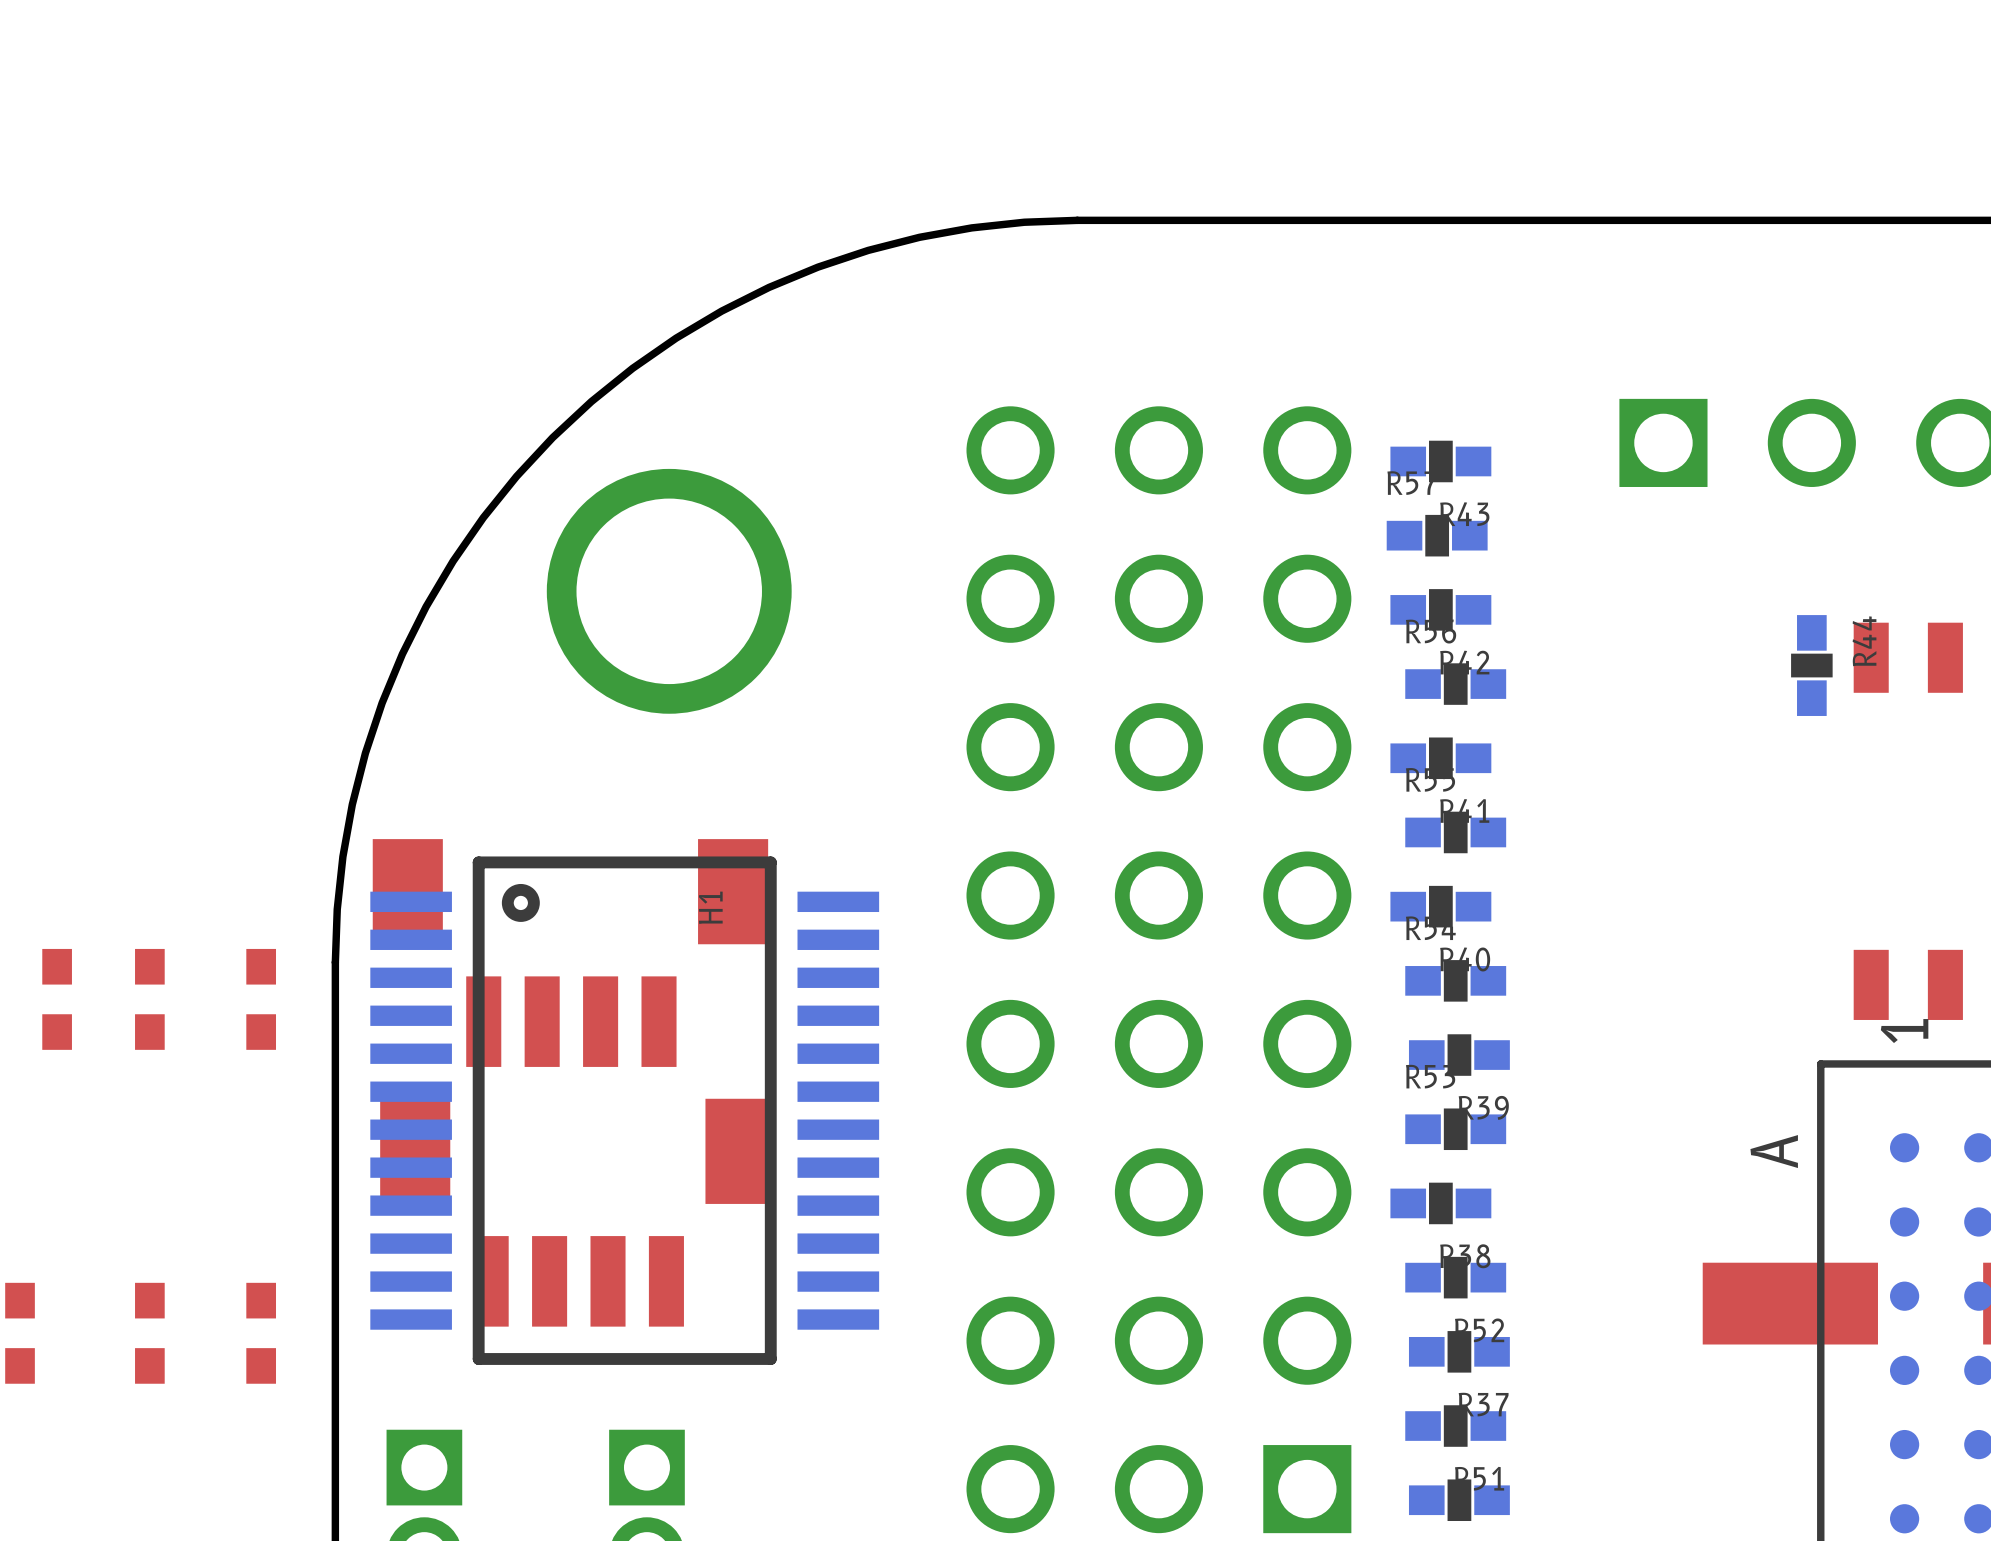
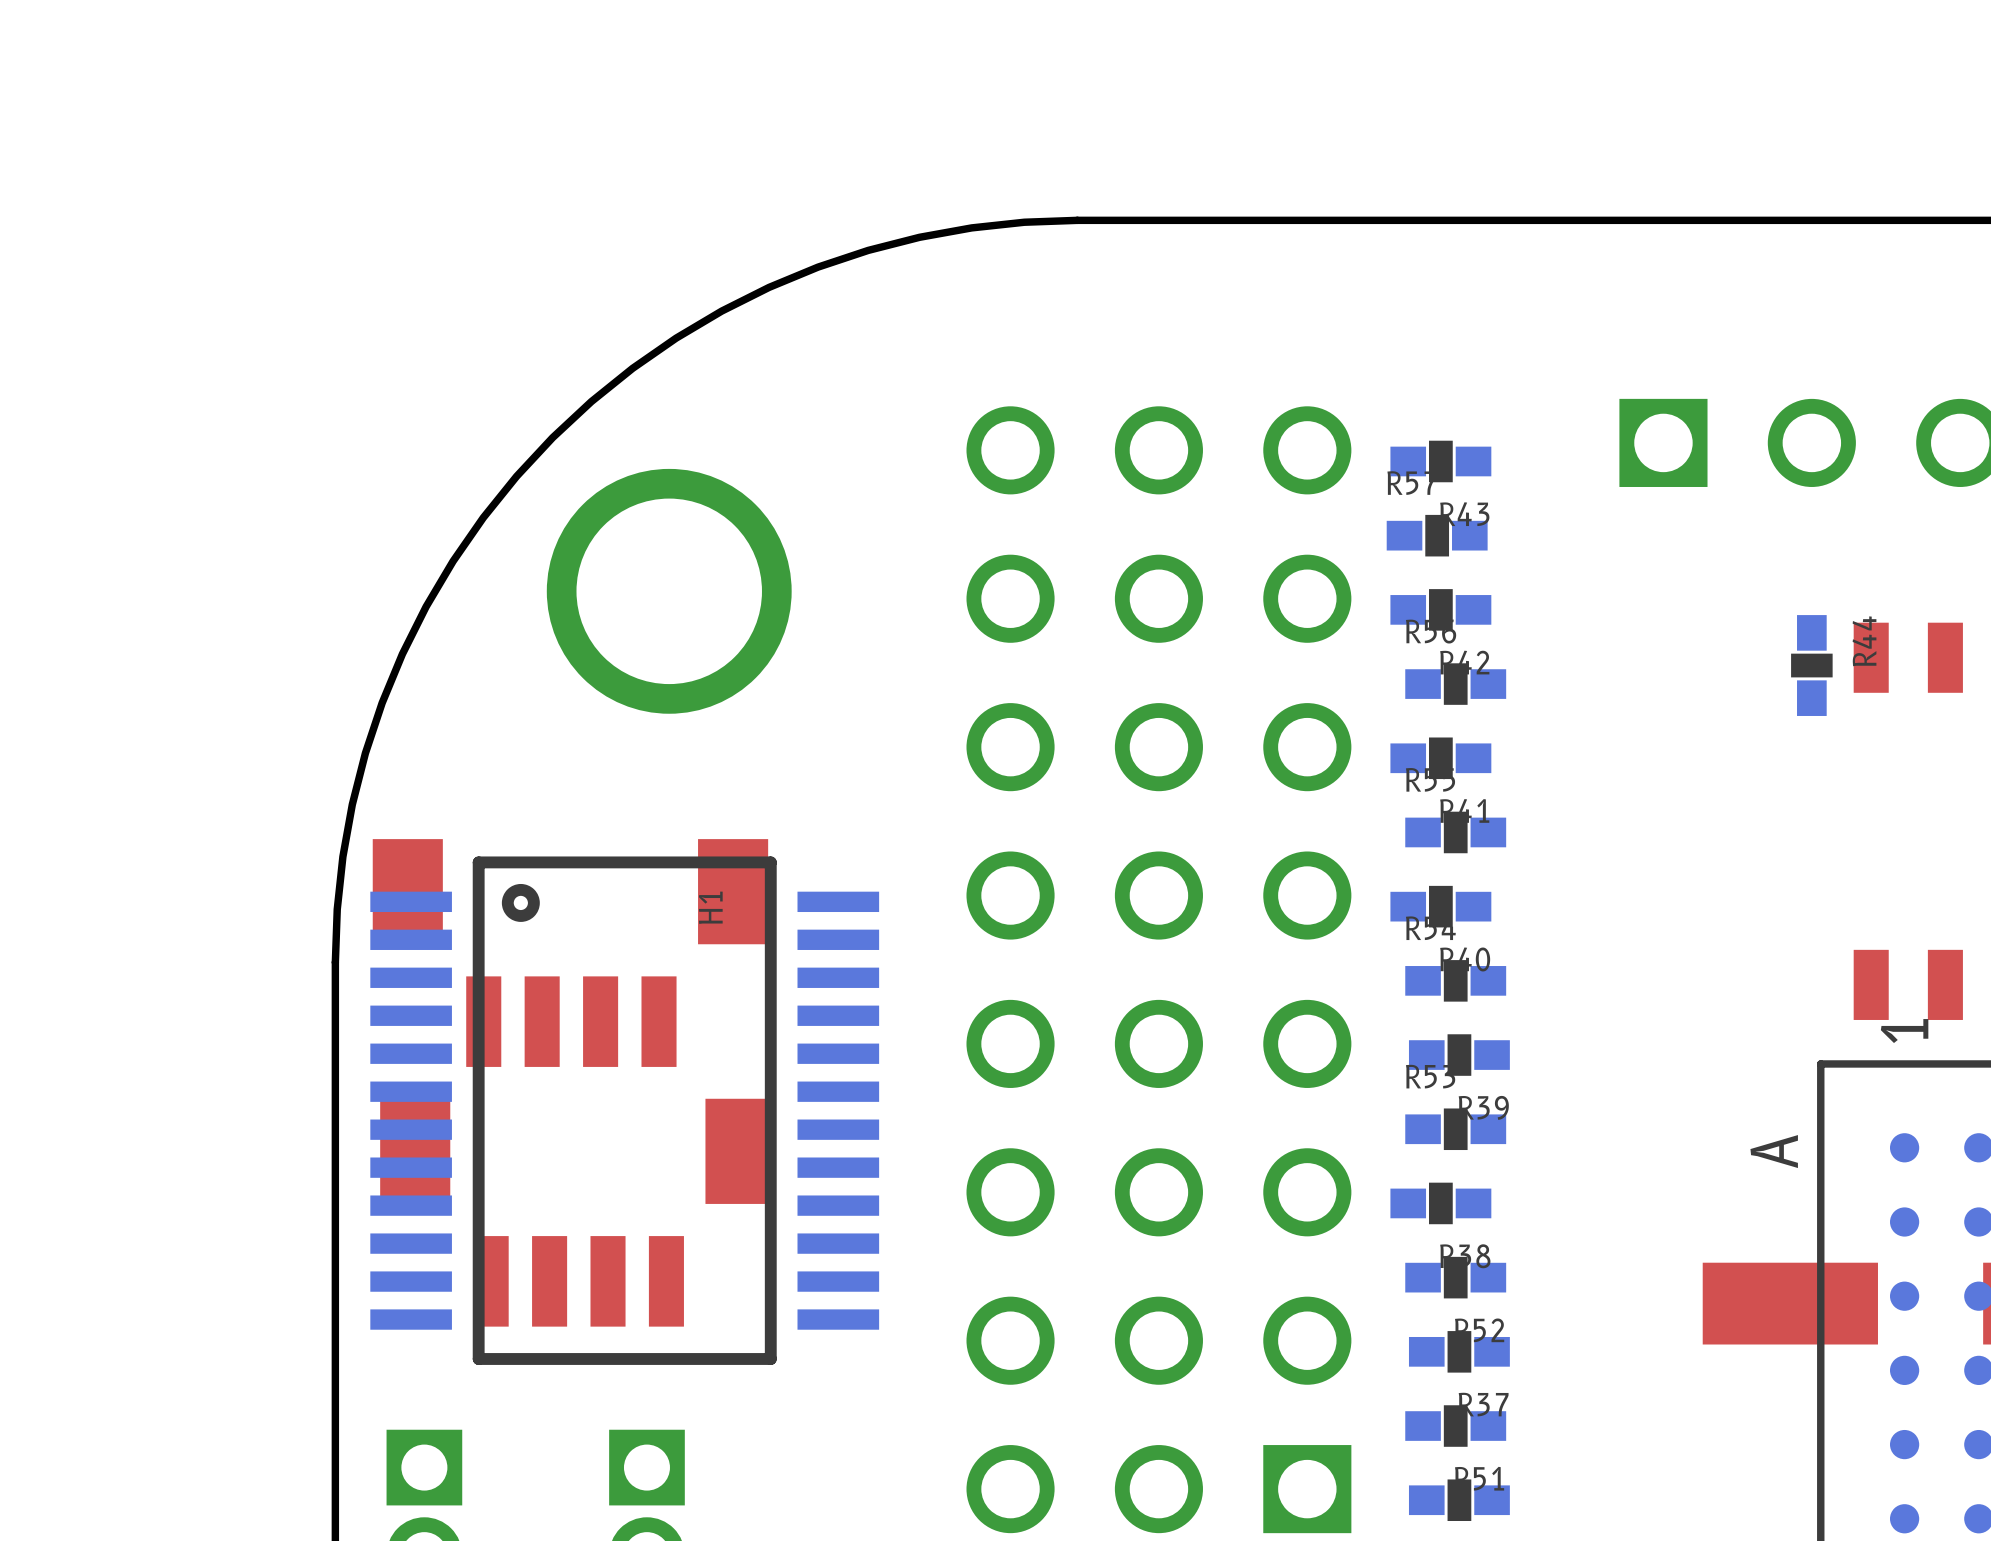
part: (57, 999) -> none
part: (149, 999) -> none
part: (261, 999) -> none
part: (20, 1333) -> none
part: (149, 1333) -> none
part: (261, 1333) -> none

